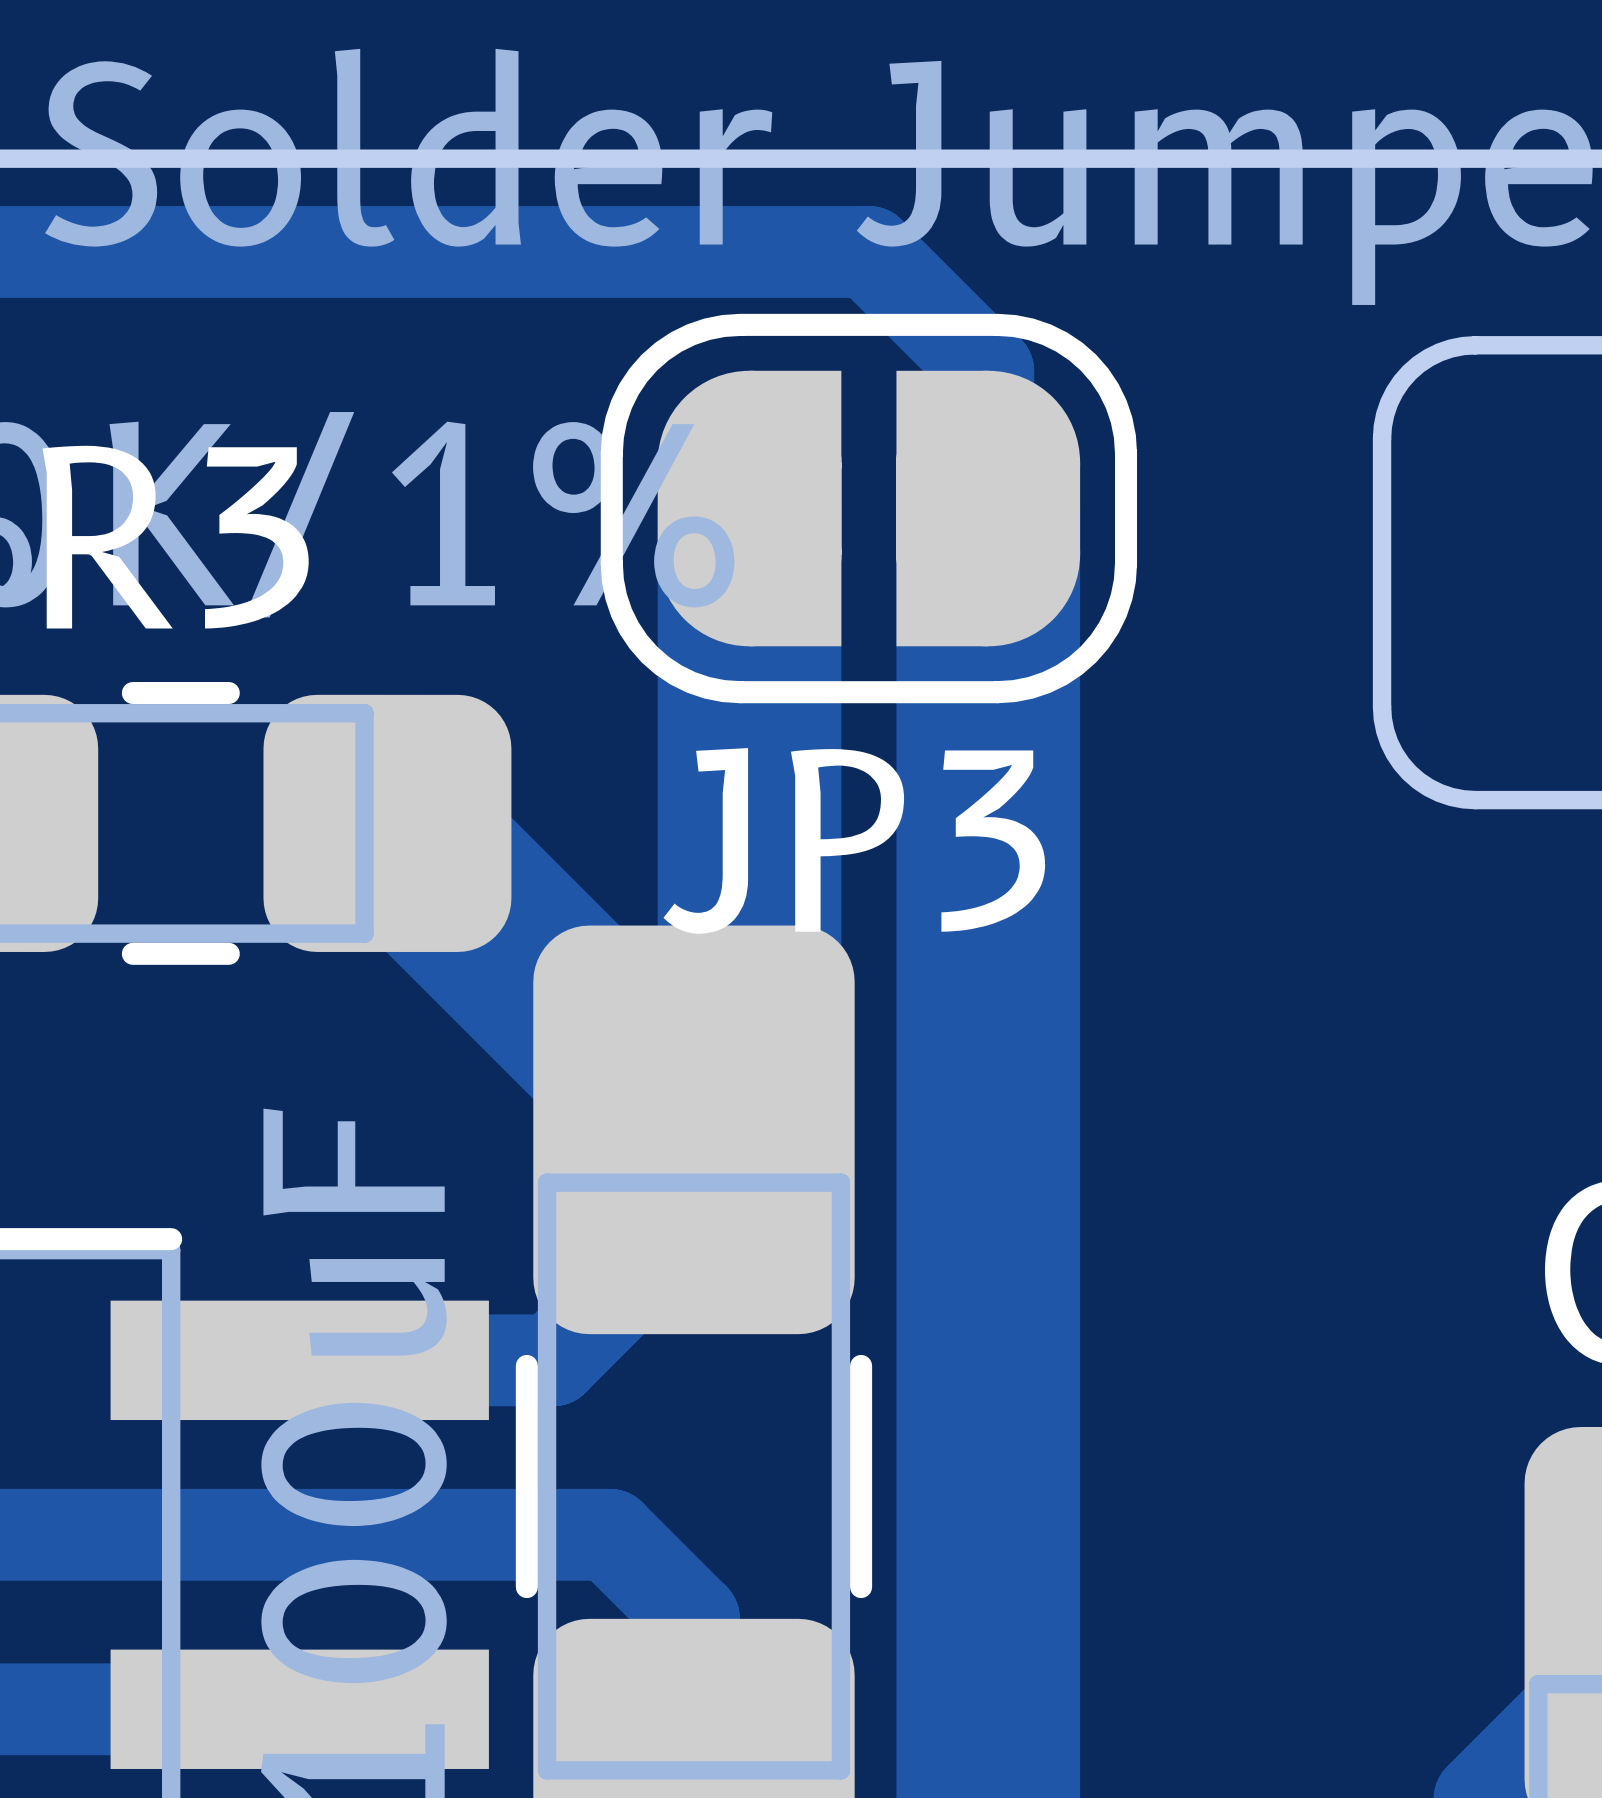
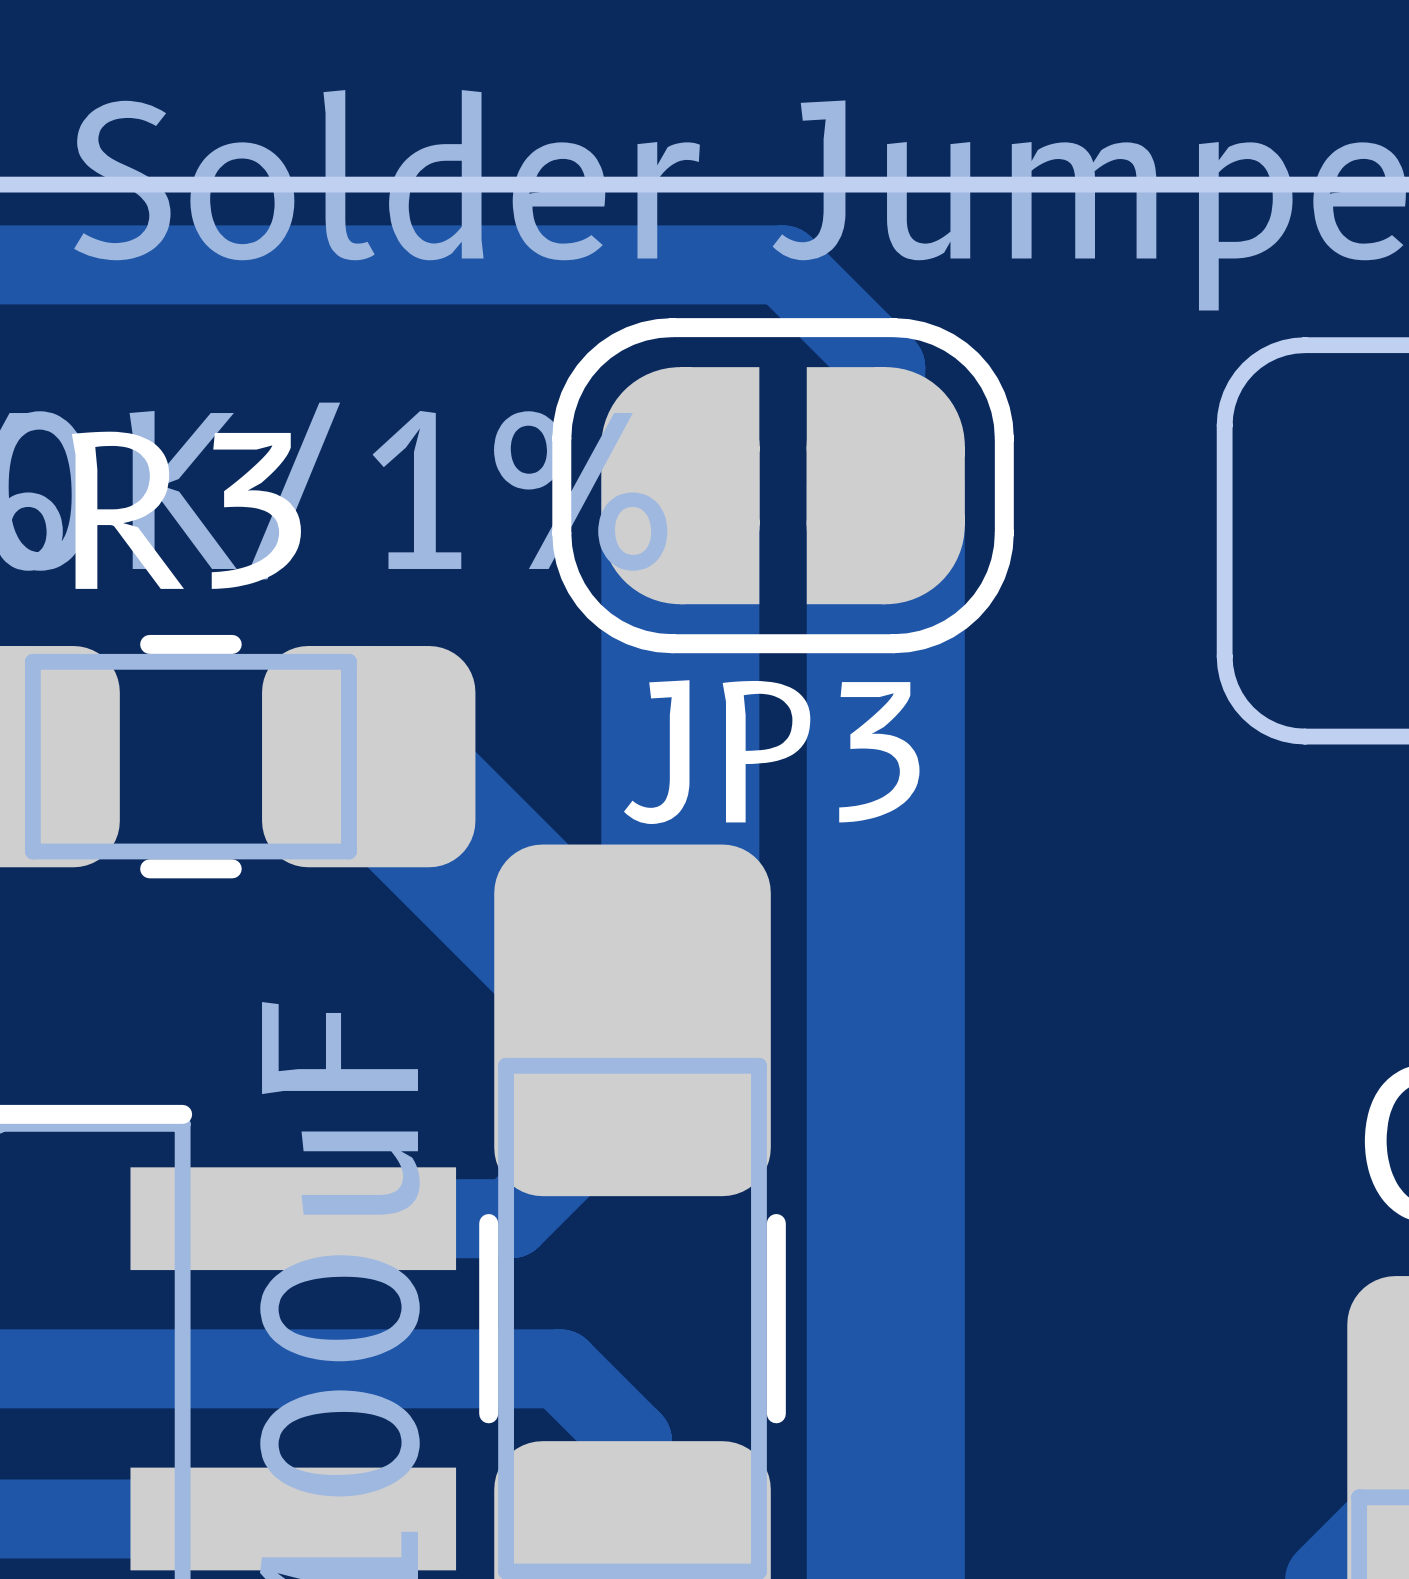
JP3 name position: JP3 (854, 840) -> JP3 (771, 752)

